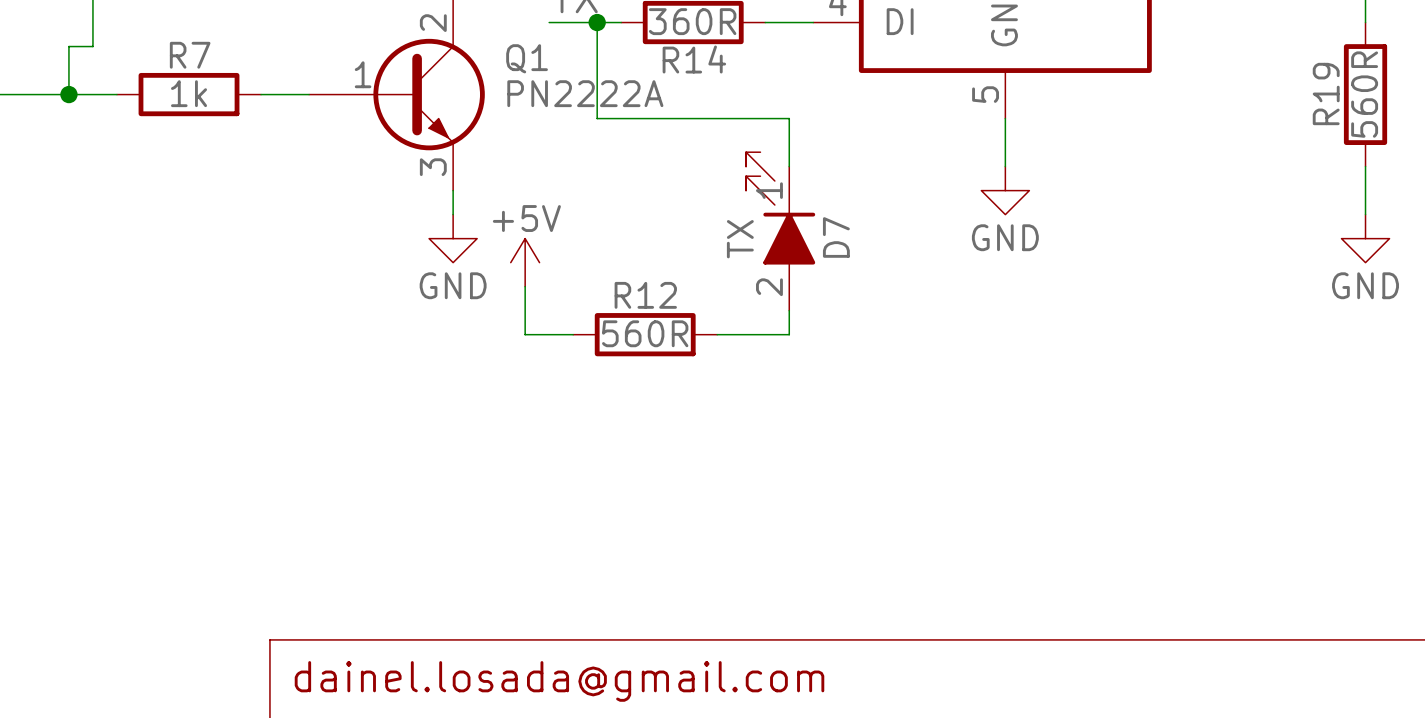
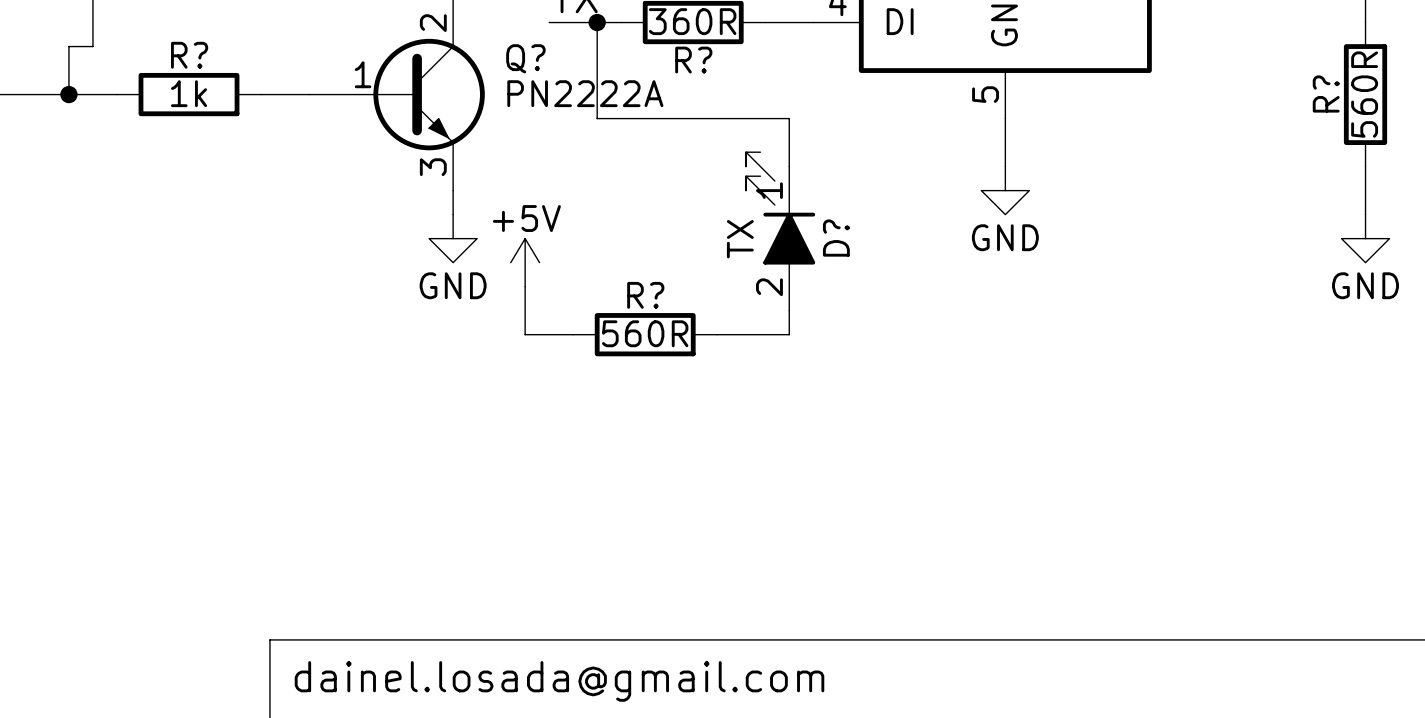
R7 name: R7 (190, 55) -> R? (189, 55)
Q1 name: Q1 (527, 58) -> Q? (525, 58)
R14 name: R14 (694, 59) -> R? (693, 60)
R19 name: R19 (1326, 94) -> R? (1326, 94)
D7 name: D7 (836, 237) -> D? (836, 238)
R12 name: R12 (645, 295) -> R? (645, 295)

